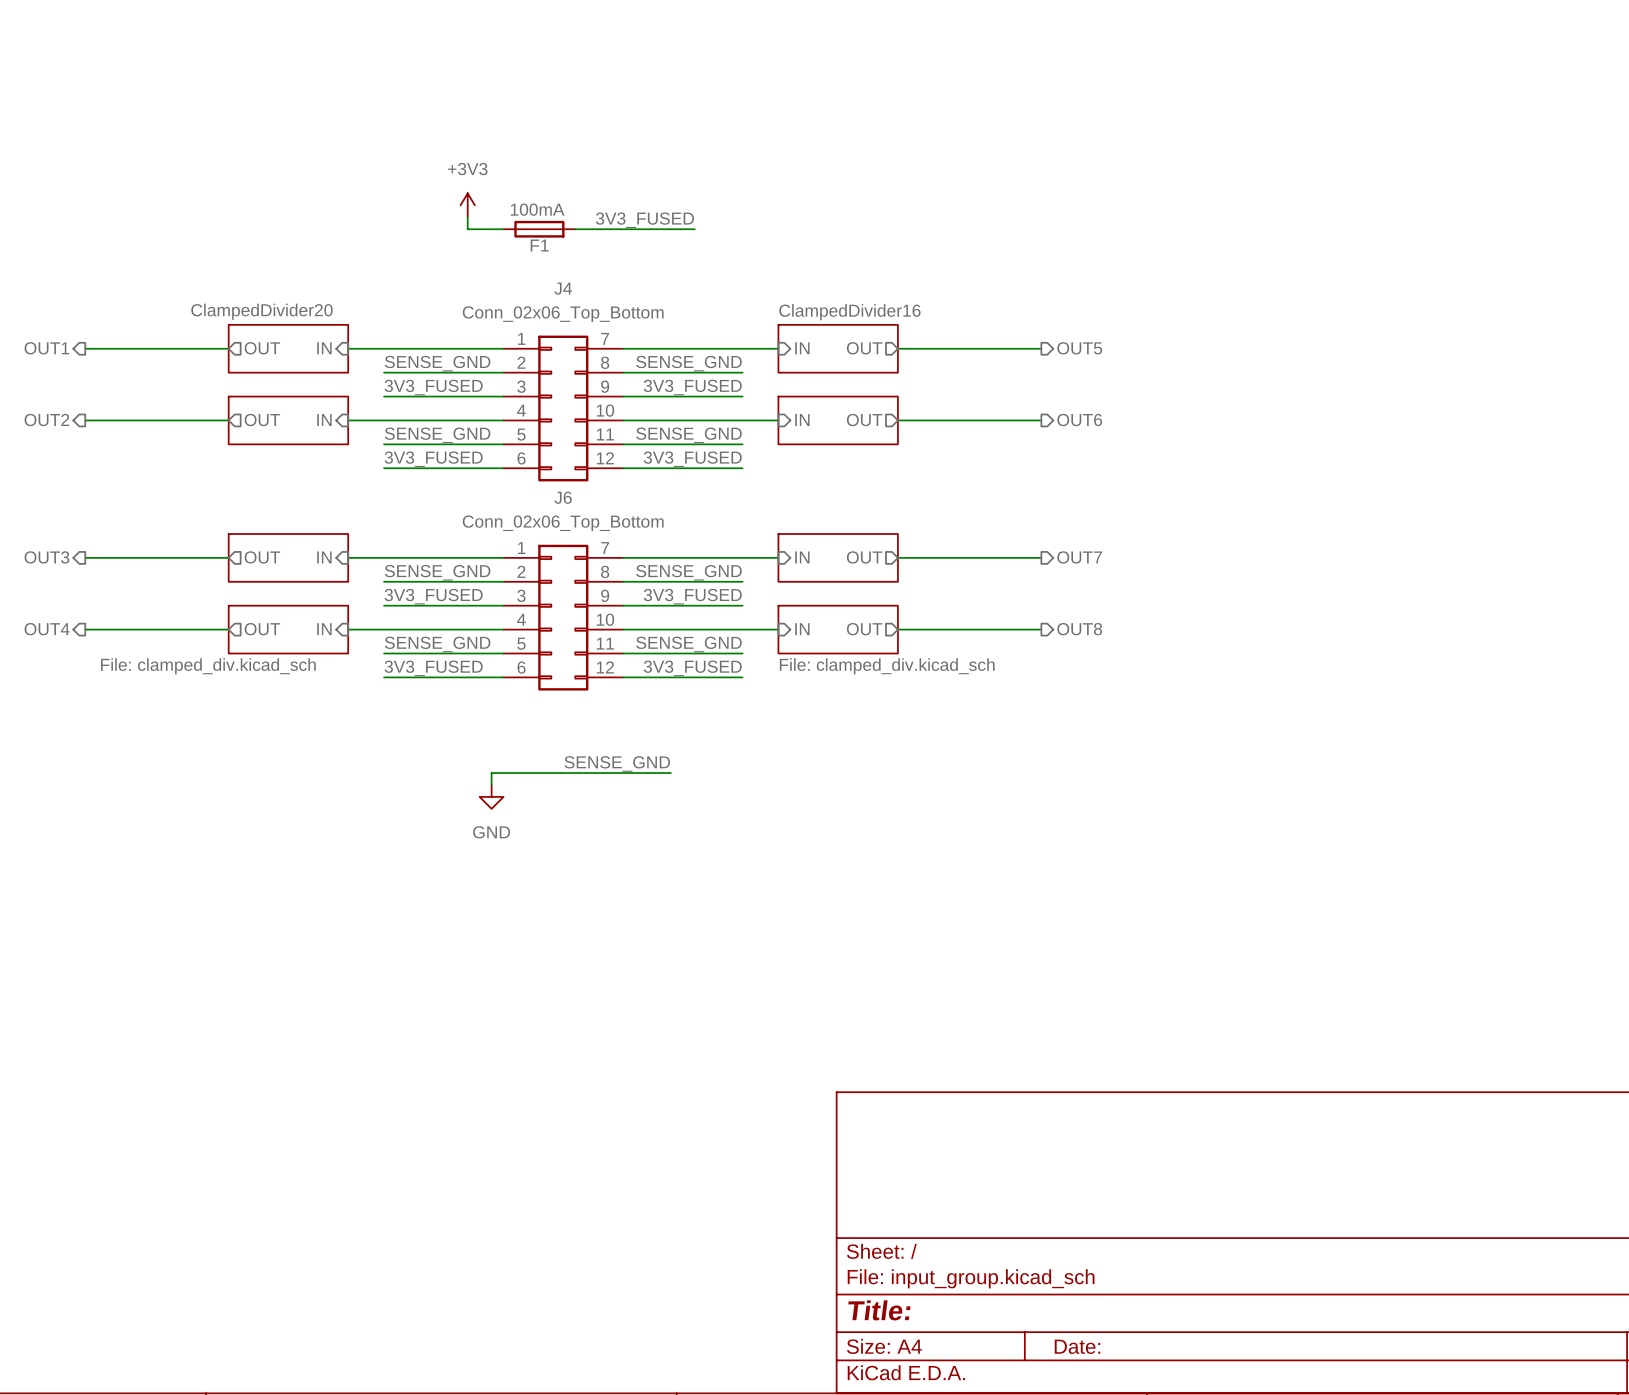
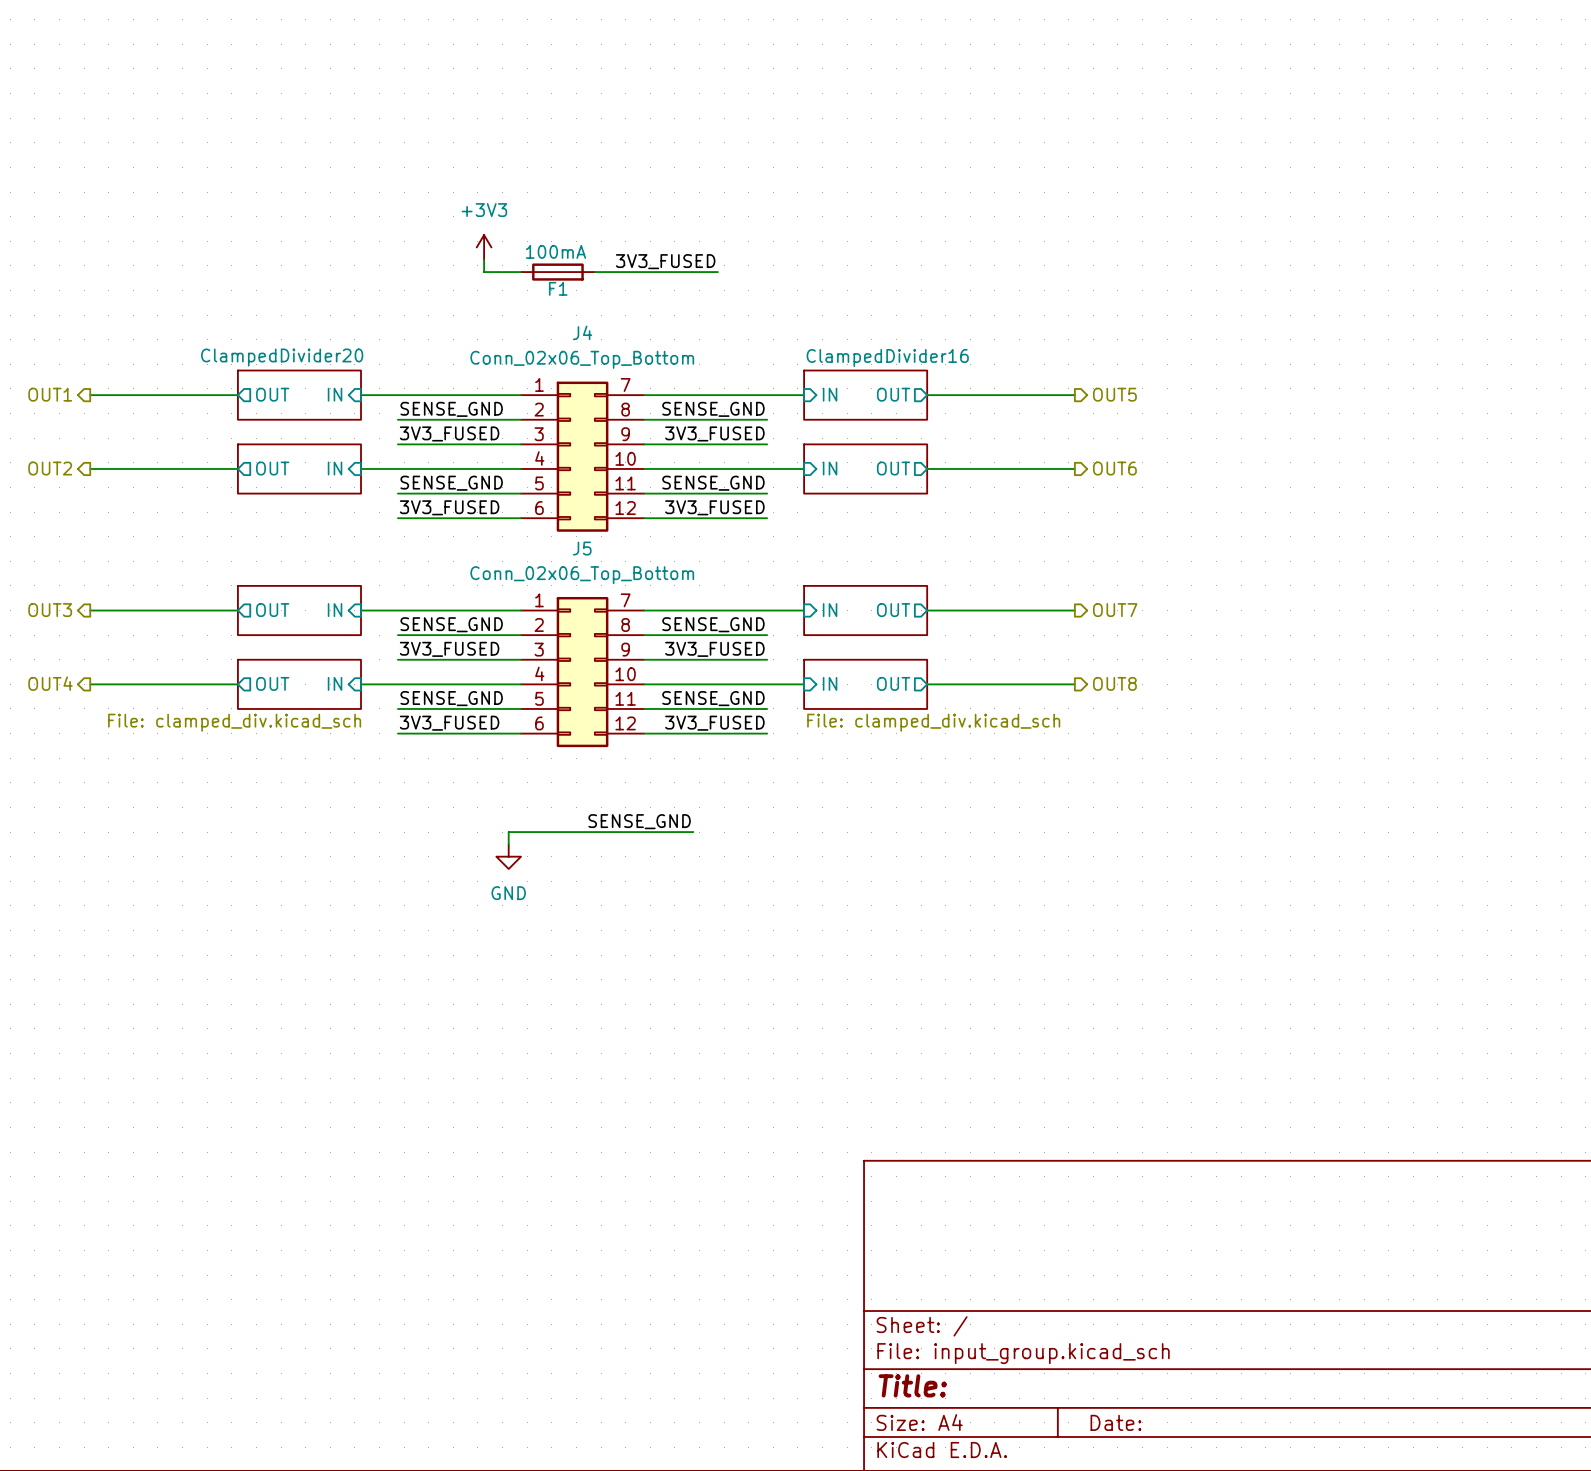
J6 name: J6 (563, 497) -> J5 (582, 548)

